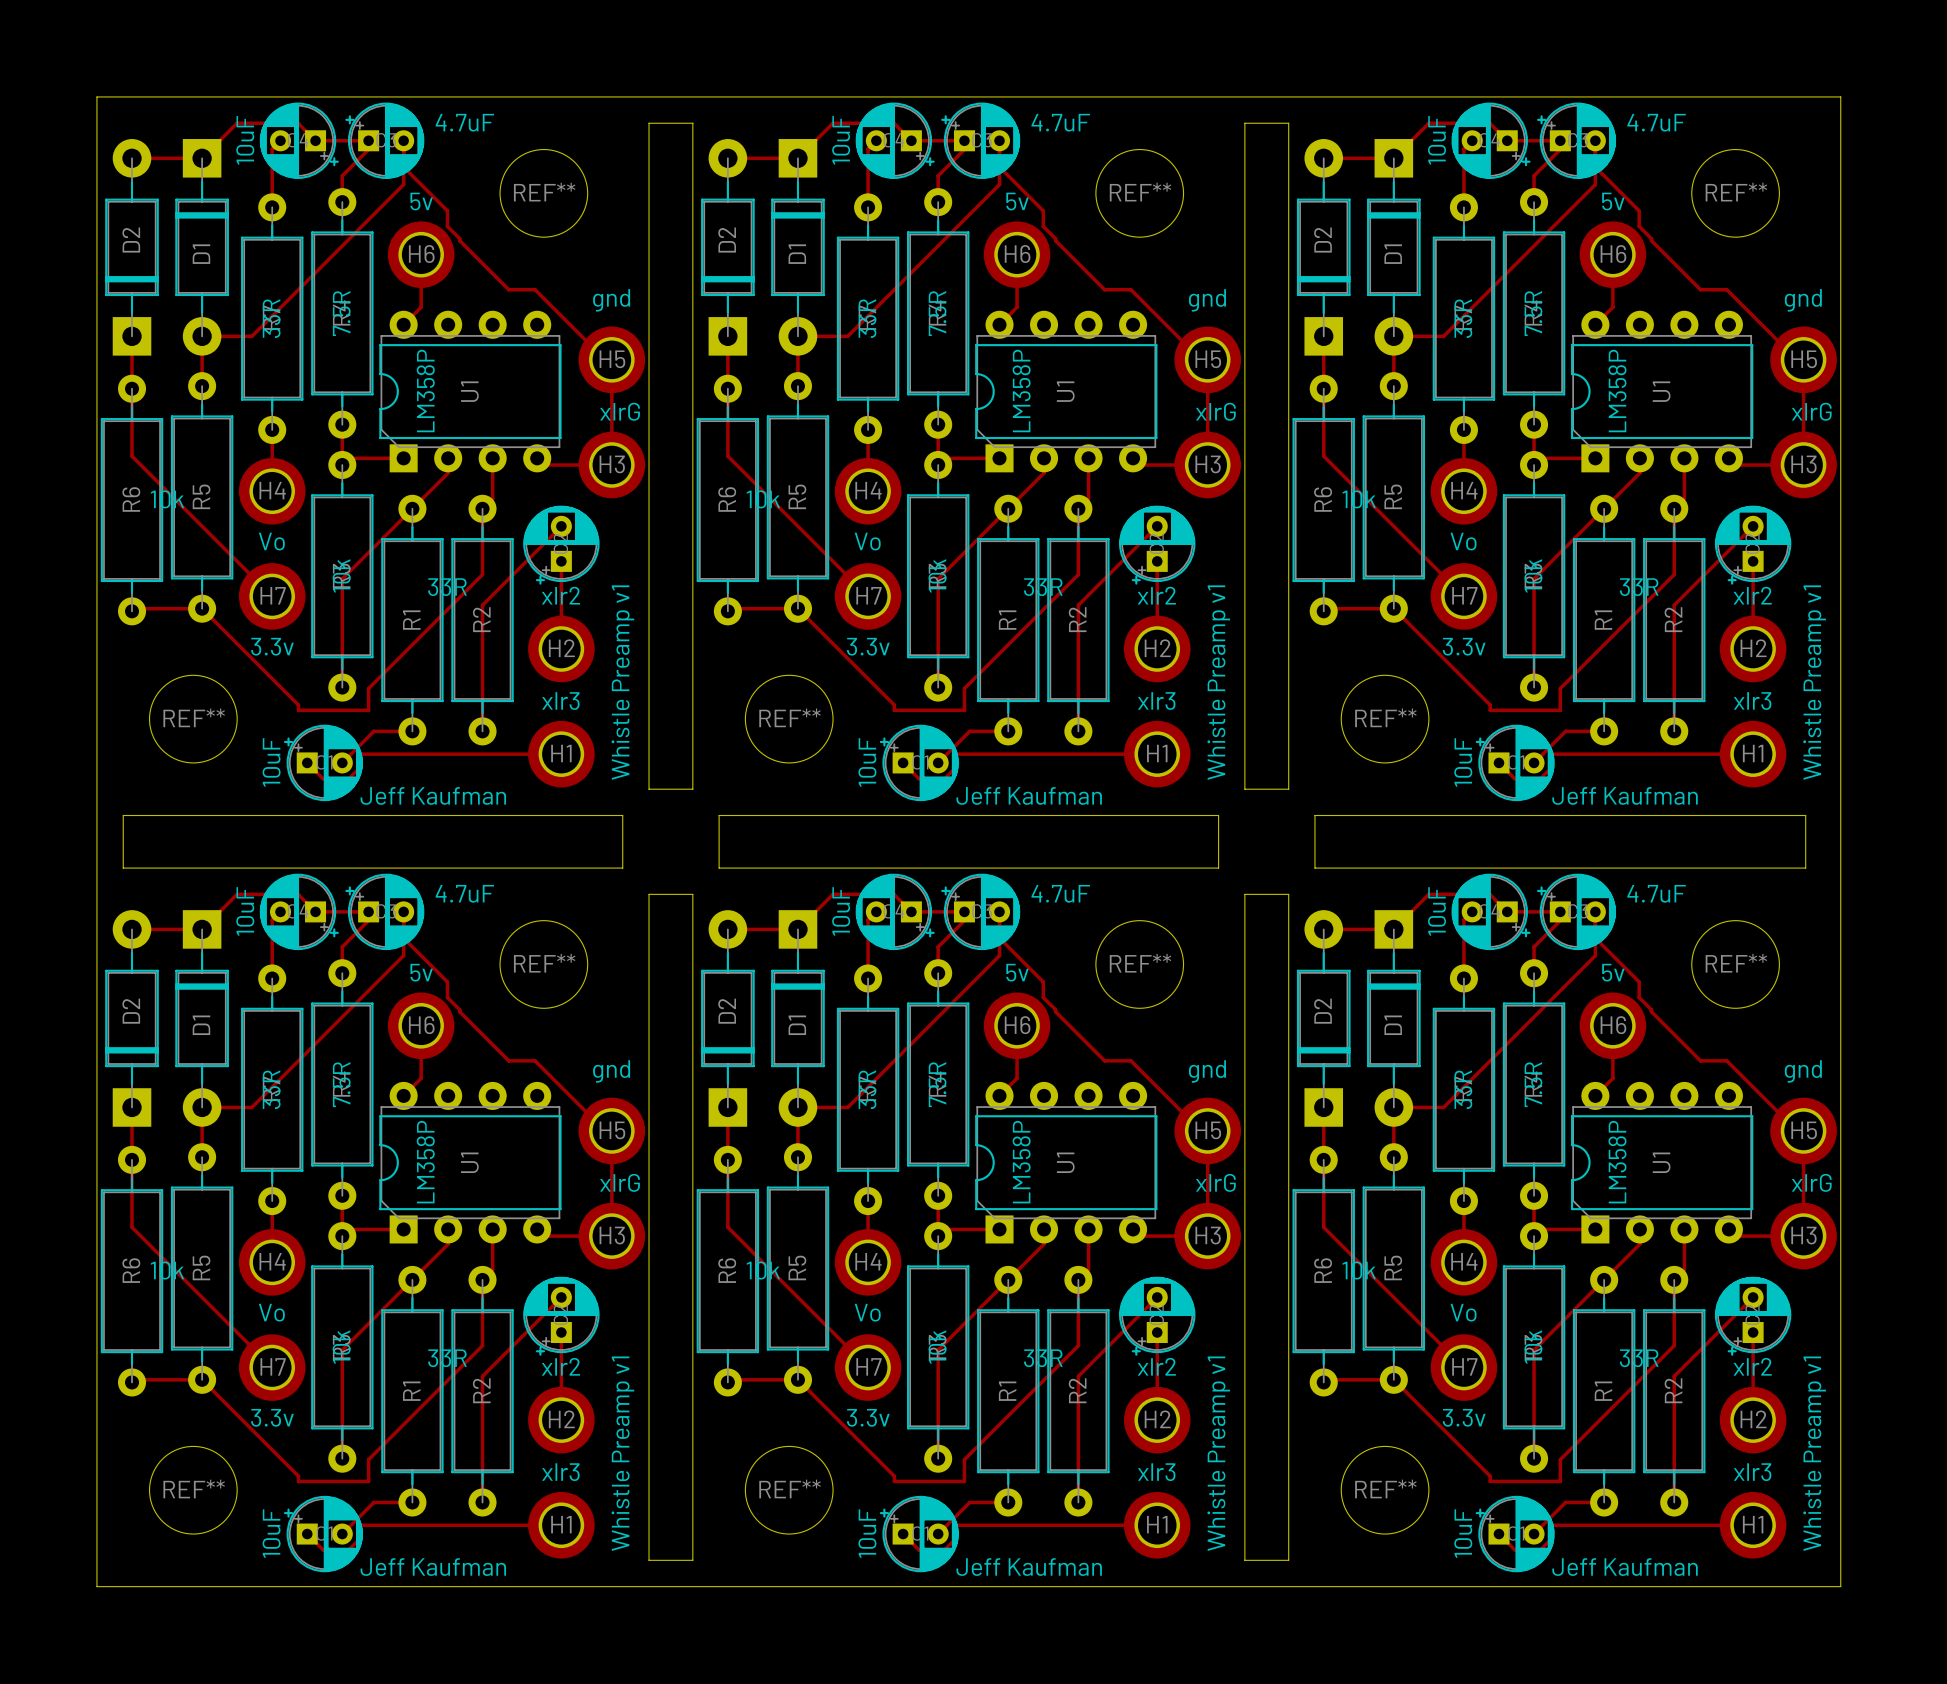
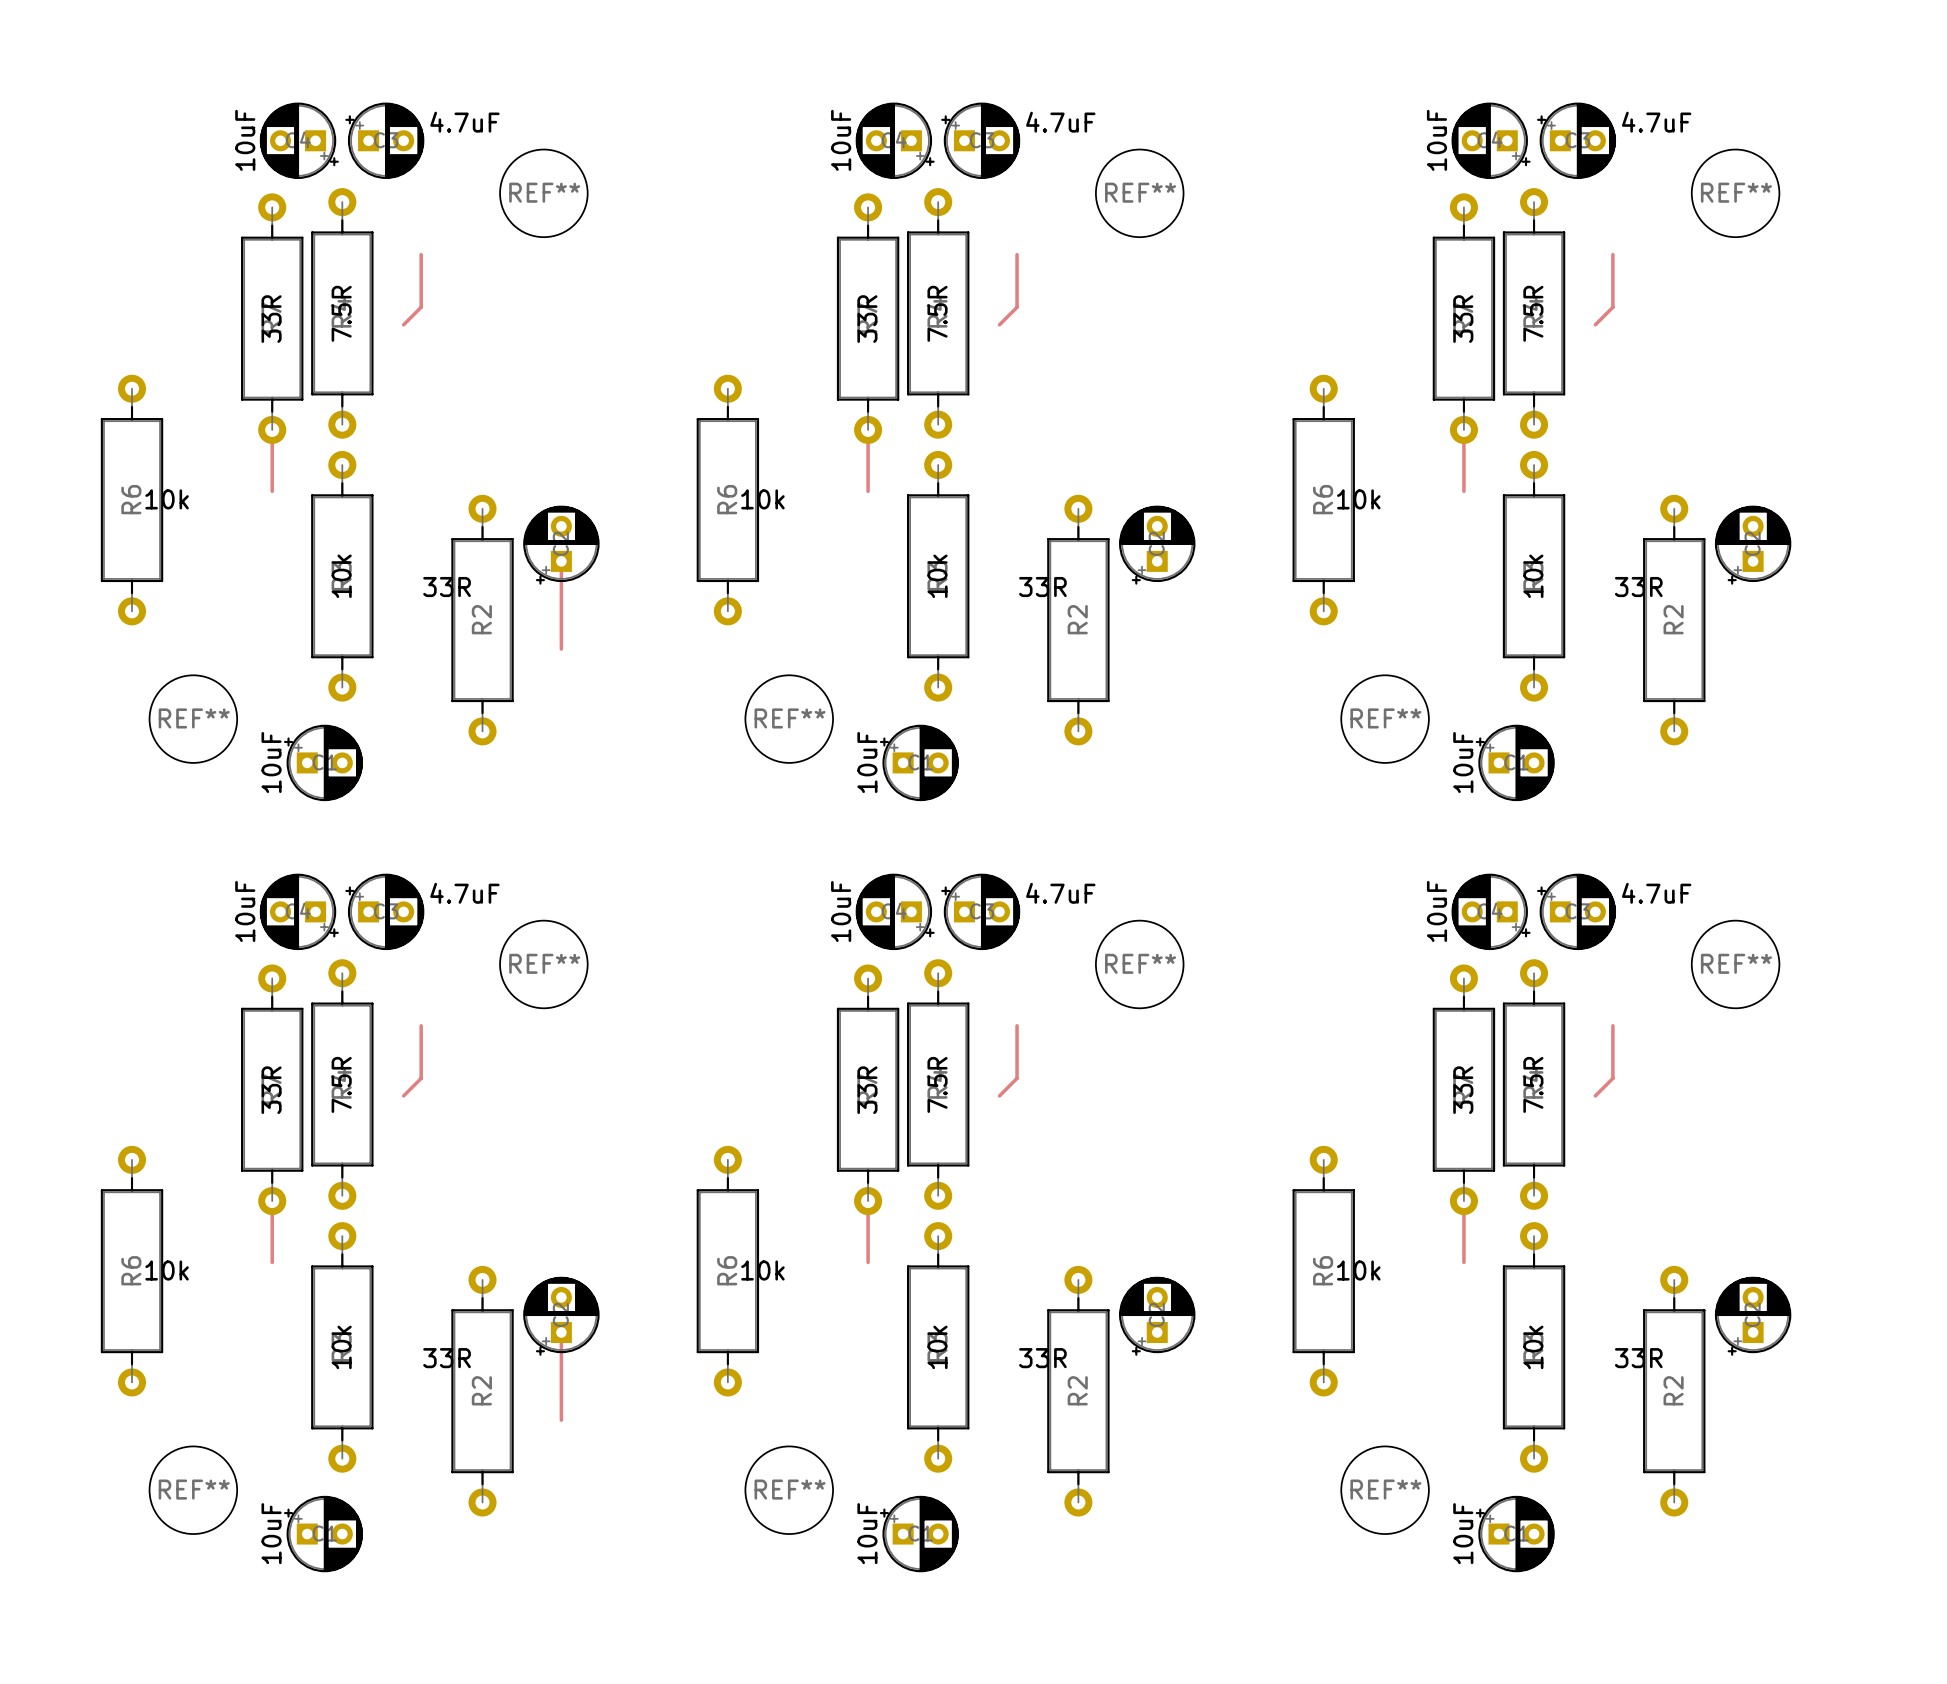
board edge: (96, 96) (1840, 96) (1840, 1586) (96, 1586) (96, 96) -> none
board edge: (649, 123) (649, 789) (692, 789) (692, 123) (649, 123) -> none
board edge: (1244, 123) (1244, 789) (1288, 789) (1288, 123) (1244, 123) -> none
track: (280, 140) (272, 149) (272, 207) -> none
track: (403, 140) (403, 184) (251, 336) (202, 336) (202, 386) -> none
track: (876, 140) (868, 149) (868, 207) -> none
track: (999, 140) (999, 184) (847, 336) (797, 336) (797, 386) -> none
track: (1472, 140) (1463, 149) (1463, 207) -> none
track: (1595, 140) (1595, 184) (1443, 336) (1393, 336) (1393, 386) -> none
track: (132, 158) (202, 158) (237, 123) (298, 123) (315, 140) (368, 140) (368, 149) (342, 175) (342, 202) -> none
track: (727, 158) (797, 158) (833, 123) (894, 123) (911, 140) (964, 140) (964, 149) (938, 175) (938, 202) -> none
track: (1323, 158) (1393, 158) (1428, 123) (1490, 123) (1507, 140) (1560, 140) (1560, 149) (1534, 175) (1534, 202) -> none
track: (403, 167) (447, 210) (447, 226) (508, 289) (535, 289) (605, 359) (611, 359) (611, 464) (543, 464) (537, 458) -> none
track: (999, 167) (1043, 210) (1043, 226) (1104, 289) (1130, 289) (1201, 359) (1207, 359) (1207, 464) (1139, 464) (1133, 458) -> none
track: (1595, 167) (1639, 210) (1639, 226) (1700, 289) (1726, 289) (1796, 359) (1803, 359) (1803, 464) (1735, 464) (1728, 458) -> none
D2: (132, 247) -> none
D1: (202, 247) -> none
D2: (727, 247) -> none
D1: (797, 247) -> none
D2: (1323, 247) -> none
D1: (1393, 247) -> none
H6: 5v (421, 254) -> none
H6: 5v (1017, 254) -> none
H6: 5v (1612, 254) -> none
track: (132, 336) (132, 456) (272, 596) -> none
track: (727, 336) (727, 456) (868, 596) -> none
track: (1323, 336) (1323, 456) (1463, 596) -> none
H5: gnd (611, 359) -> none
H5: gnd (1207, 359) -> none
H5: gnd (1803, 359) -> none
U1: LM358P (470, 391) -> none
U1: LM358P (1066, 391) -> none
U1: LM358P (1662, 391) -> none
track: (342, 424) (342, 464) (348, 458) (403, 458) -> none
track: (938, 424) (938, 464) (944, 458) (999, 458) -> none
track: (1534, 424) (1534, 464) (1540, 458) (1595, 458) -> none
track: (448, 458) (448, 473) (342, 578) (342, 687) -> none
track: (492, 458) (492, 498) (482, 508) (482, 574) (368, 688) (368, 710) (298, 710) (298, 705) (202, 608) (134, 608) (132, 611) -> none
track: (1044, 458) (1044, 473) (938, 578) (938, 687) -> none
track: (1088, 458) (1088, 498) (1078, 508) (1078, 574) (964, 688) (964, 710) (894, 710) (894, 705) (797, 608) (730, 608) (727, 611) -> none
track: (1639, 458) (1639, 473) (1534, 578) (1534, 687) -> none
track: (1684, 458) (1684, 498) (1674, 508) (1674, 574) (1560, 688) (1560, 710) (1490, 710) (1490, 705) (1393, 608) (1326, 608) (1323, 611) -> none
H3: xlrG (611, 464) -> none
H3: xlrG (1207, 464) -> none
H3: xlrG (1803, 464) -> none
H4: Vo (272, 491) -> none
H4: Vo (868, 491) -> none
H4: Vo (1463, 491) -> none
R5: (202, 497) -> none
R5: (797, 497) -> none
R5: (1393, 497) -> none
track: (561, 526) (482, 605) (482, 731) -> none
track: (1157, 526) (1078, 605) (1078, 731) -> none
track: (1753, 526) (1674, 605) (1674, 731) -> none
track: (1157, 561) (1157, 649) -> none
track: (1753, 561) (1753, 649) -> none
H7: 3.3v (272, 596) -> none
H7: 3.3v (868, 596) -> none
H7: 3.3v (1463, 596) -> none
R1: (412, 620) -> none
R1: (1008, 620) -> none
R1: (1604, 620) -> none
H2: xlr2 (561, 649) -> none
H2: xlr2 (1157, 649) -> none
H2: xlr2 (1753, 649) -> none
text: Whistle Preamp v1 (622, 682) -> none
text: Whistle Preamp v1 (1218, 682) -> none
text: Whistle Preamp v1 (1814, 682) -> none
track: (412, 731) (373, 731) (342, 762) -> none
track: (1008, 731) (969, 731) (938, 762) -> none
track: (1604, 731) (1565, 731) (1534, 762) -> none
track: (561, 754) (360, 754) (358, 757) (358, 769) (348, 778) (323, 778) (307, 762) -> none
H1: xlr3 (561, 754) -> none
track: (1157, 754) (956, 754) (953, 757) (953, 769) (944, 778) (918, 778) (903, 762) -> none
H1: xlr3 (1157, 754) -> none
track: (1753, 754) (1552, 754) (1549, 757) (1549, 769) (1540, 778) (1514, 778) (1498, 762) -> none
H1: xlr3 (1753, 754) -> none
text: Jeff Kaufman (433, 795) -> none
text: Jeff Kaufman (1029, 795) -> none
text: Jeff Kaufman (1625, 795) -> none
board edge: (123, 815) (622, 815) (622, 868) (123, 868) (123, 815) -> none
board edge: (719, 815) (1218, 815) (1218, 868) (719, 868) (719, 815) -> none
board edge: (1314, 815) (1805, 815) (1805, 868) (1314, 868) (1314, 815) -> none
board edge: (649, 894) (692, 894) (692, 1560) (649, 1560) (649, 894) -> none
board edge: (1244, 894) (1288, 894) (1288, 1560) (1244, 1560) (1244, 894) -> none
track: (280, 911) (272, 920) (272, 978) -> none
track: (403, 911) (403, 955) (251, 1107) (202, 1107) (202, 1157) -> none
track: (876, 911) (868, 920) (868, 978) -> none
track: (999, 911) (999, 955) (847, 1107) (797, 1107) (797, 1157) -> none
track: (1472, 911) (1463, 920) (1463, 978) -> none
track: (1595, 911) (1595, 955) (1443, 1107) (1393, 1107) (1393, 1157) -> none
track: (132, 929) (202, 929) (237, 894) (298, 894) (315, 911) (368, 911) (368, 920) (342, 946) (342, 973) -> none
track: (727, 929) (797, 929) (833, 894) (894, 894) (911, 911) (964, 911) (964, 920) (938, 946) (938, 973) -> none
track: (1323, 929) (1393, 929) (1428, 894) (1490, 894) (1507, 911) (1560, 911) (1560, 920) (1534, 946) (1534, 973) -> none
track: (403, 938) (447, 981) (447, 997) (508, 1060) (535, 1060) (605, 1130) (611, 1130) (611, 1236) (543, 1236) (537, 1229) -> none
track: (999, 938) (1043, 981) (1043, 997) (1104, 1060) (1130, 1060) (1201, 1130) (1207, 1130) (1207, 1236) (1139, 1236) (1133, 1229) -> none
track: (1595, 938) (1639, 981) (1639, 997) (1700, 1060) (1726, 1060) (1796, 1130) (1803, 1130) (1803, 1236) (1735, 1236) (1728, 1229) -> none
D2: (132, 1018) -> none
D1: (202, 1018) -> none
D2: (727, 1018) -> none
D1: (797, 1018) -> none
D2: (1323, 1018) -> none
D1: (1393, 1018) -> none
H6: 5v (421, 1025) -> none
H6: 5v (1017, 1025) -> none
H6: 5v (1612, 1025) -> none
track: (132, 1107) (132, 1227) (272, 1367) -> none
track: (727, 1107) (727, 1227) (868, 1367) -> none
track: (1323, 1107) (1323, 1227) (1463, 1367) -> none
H5: gnd (611, 1130) -> none
H5: gnd (1207, 1130) -> none
H5: gnd (1803, 1130) -> none
U1: LM358P (470, 1162) -> none
U1: LM358P (1066, 1162) -> none
U1: LM358P (1662, 1162) -> none
track: (342, 1195) (342, 1236) (348, 1229) (403, 1229) -> none
track: (938, 1195) (938, 1236) (944, 1229) (999, 1229) -> none
track: (1534, 1195) (1534, 1236) (1540, 1229) (1595, 1229) -> none
track: (448, 1229) (448, 1244) (342, 1350) (342, 1458) -> none
track: (492, 1229) (492, 1269) (482, 1279) (482, 1345) (368, 1459) (368, 1481) (298, 1481) (298, 1476) (202, 1379) (134, 1379) (132, 1382) -> none
track: (1044, 1229) (1044, 1244) (938, 1350) (938, 1458) -> none
track: (1088, 1229) (1088, 1269) (1078, 1279) (1078, 1345) (964, 1459) (964, 1481) (894, 1481) (894, 1476) (797, 1379) (730, 1379) (727, 1382) -> none
track: (1639, 1229) (1639, 1244) (1534, 1350) (1534, 1458) -> none
track: (1684, 1229) (1684, 1269) (1674, 1279) (1674, 1345) (1560, 1459) (1560, 1481) (1490, 1481) (1490, 1476) (1393, 1379) (1326, 1379) (1323, 1382) -> none
H3: xlrG (611, 1236) -> none
H3: xlrG (1207, 1236) -> none
H3: xlrG (1803, 1236) -> none
H4: Vo (272, 1262) -> none
H4: Vo (868, 1262) -> none
H4: Vo (1463, 1262) -> none
R5: (202, 1268) -> none
R5: (797, 1268) -> none
R5: (1393, 1268) -> none
track: (561, 1297) (482, 1376) (482, 1502) -> none
track: (1157, 1297) (1078, 1376) (1078, 1502) -> none
track: (1753, 1297) (1674, 1376) (1674, 1502) -> none
track: (1157, 1332) (1157, 1420) -> none
track: (1753, 1332) (1753, 1420) -> none
H7: 3.3v (272, 1367) -> none
H7: 3.3v (868, 1367) -> none
H7: 3.3v (1463, 1367) -> none
R1: (412, 1391) -> none
R1: (1008, 1391) -> none
R1: (1604, 1391) -> none
H2: xlr2 (561, 1420) -> none
H2: xlr2 (1157, 1420) -> none
H2: xlr2 (1753, 1420) -> none
text: Whistle Preamp v1 (622, 1453) -> none
text: Whistle Preamp v1 (1218, 1453) -> none
text: Whistle Preamp v1 (1814, 1453) -> none
track: (412, 1502) (373, 1502) (342, 1534) -> none
track: (1008, 1502) (969, 1502) (938, 1534) -> none
track: (1604, 1502) (1565, 1502) (1534, 1534) -> none
track: (561, 1525) (360, 1525) (358, 1528) (358, 1540) (348, 1549) (323, 1549) (307, 1534) -> none
H1: xlr3 (561, 1525) -> none
track: (1157, 1525) (956, 1525) (953, 1528) (953, 1540) (944, 1549) (918, 1549) (903, 1534) -> none
H1: xlr3 (1157, 1525) -> none
track: (1753, 1525) (1552, 1525) (1549, 1528) (1549, 1540) (1540, 1549) (1514, 1549) (1498, 1534) -> none
H1: xlr3 (1753, 1525) -> none
text: Jeff Kaufman (433, 1567) -> none
text: Jeff Kaufman (1029, 1567) -> none
text: Jeff Kaufman (1625, 1567) -> none

